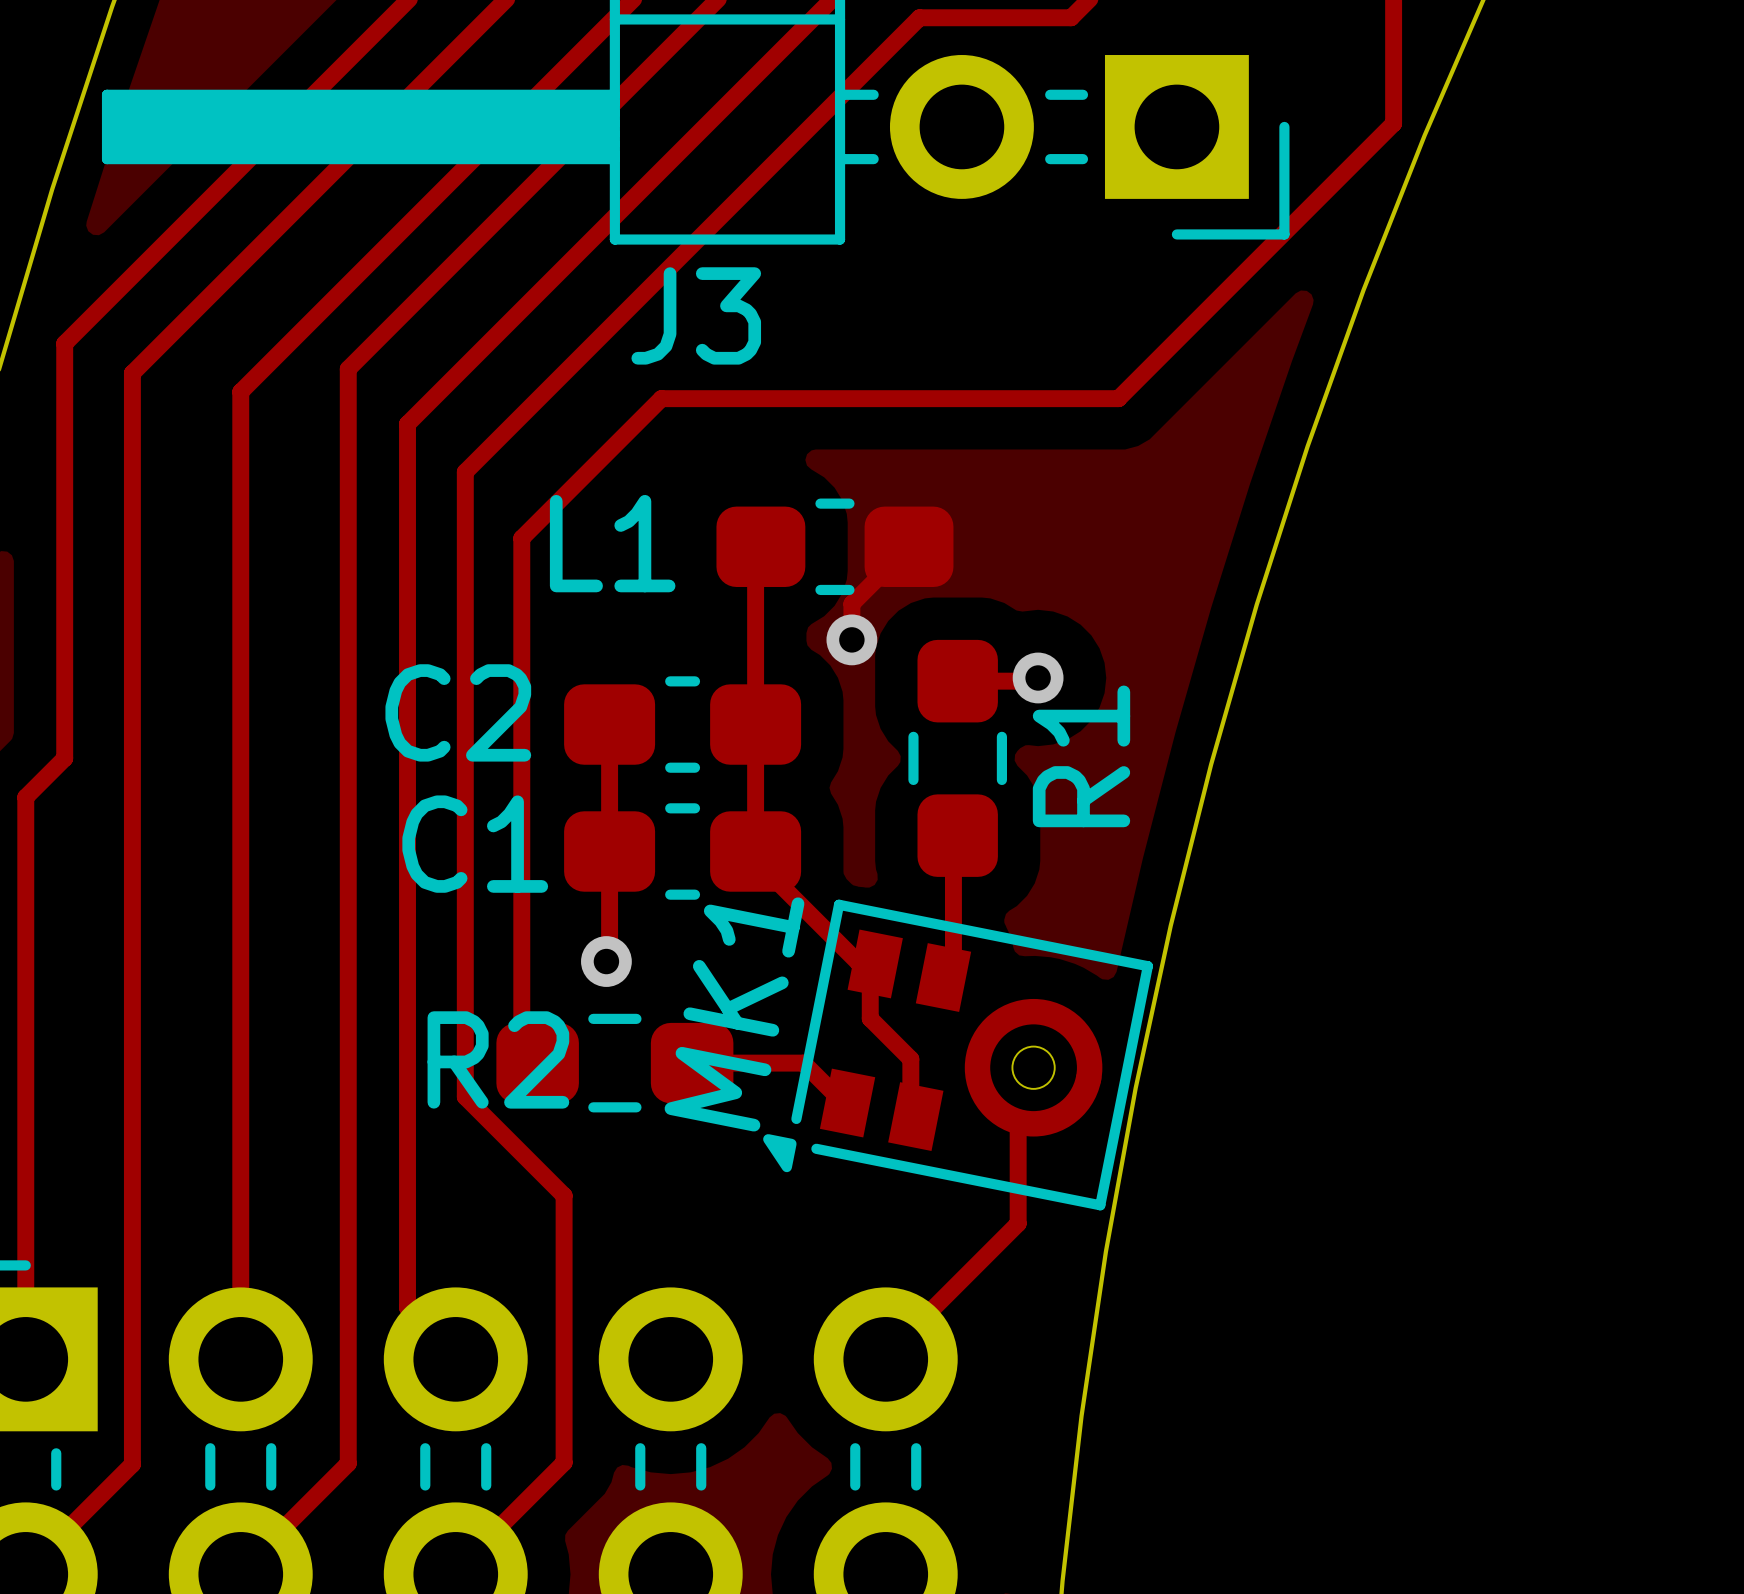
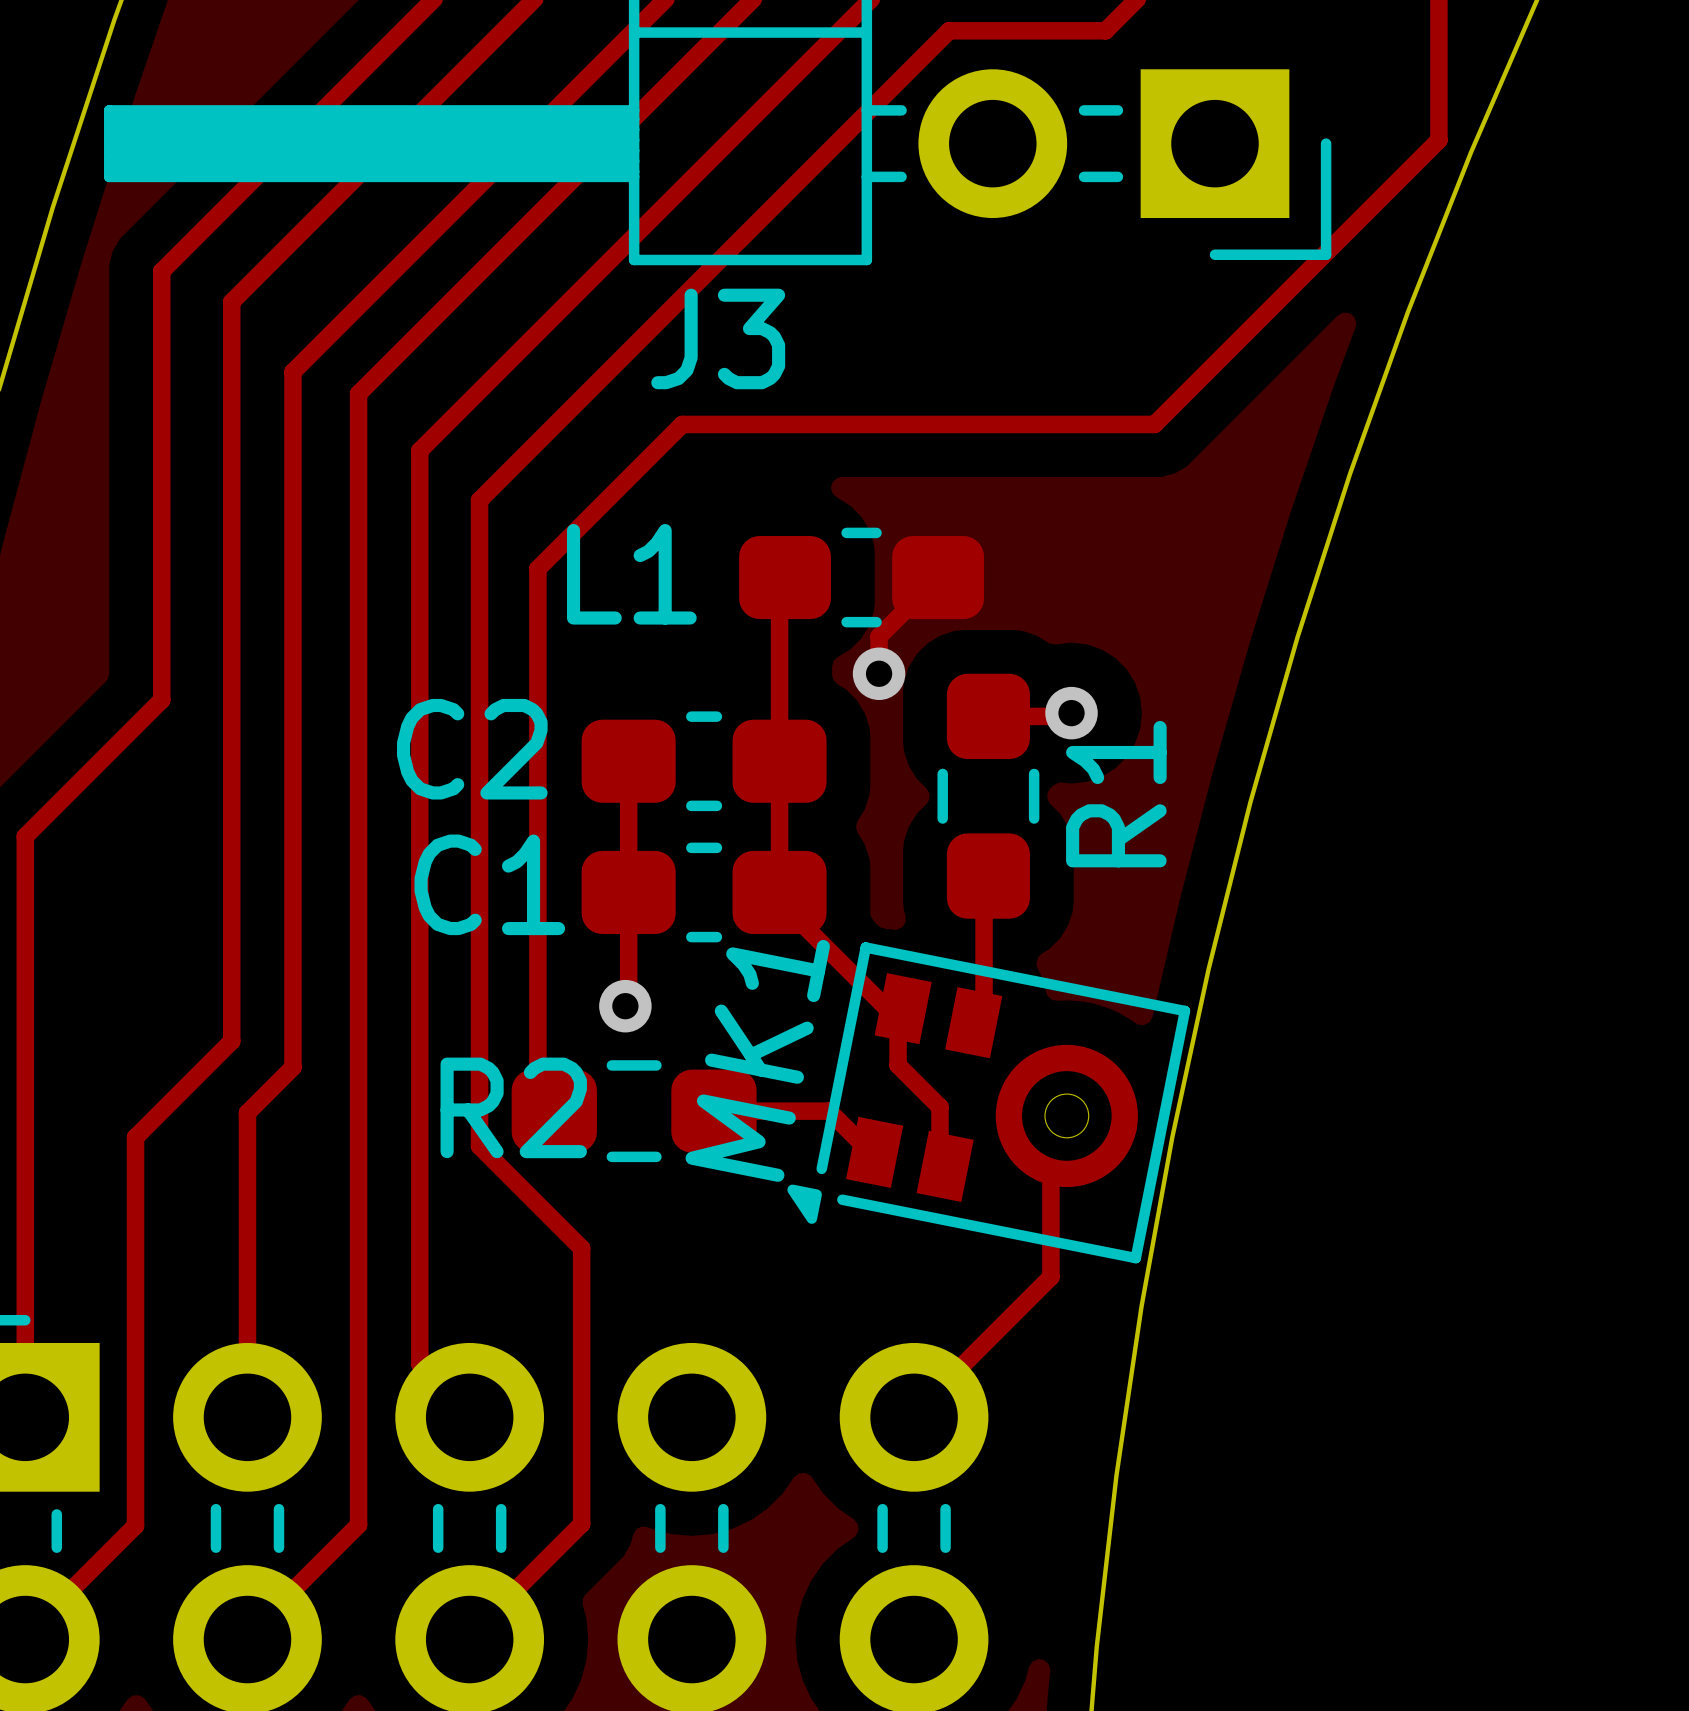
track: (157, 250) (64, 343) (64, 758) -> (161, 271) (161, 700) (65, 796)
track: (225, 280) (132, 373) (132, 1088) -> (231, 301) (231, 1041) (135, 1137)
track: (284, 347) (240, 391) (240, 1064) -> (292, 371) (292, 1067) (247, 1112)

